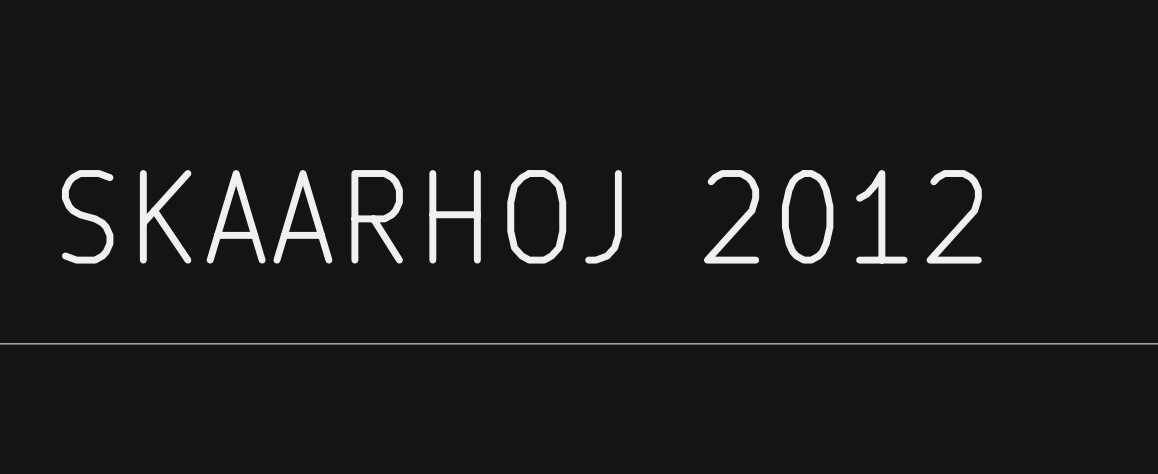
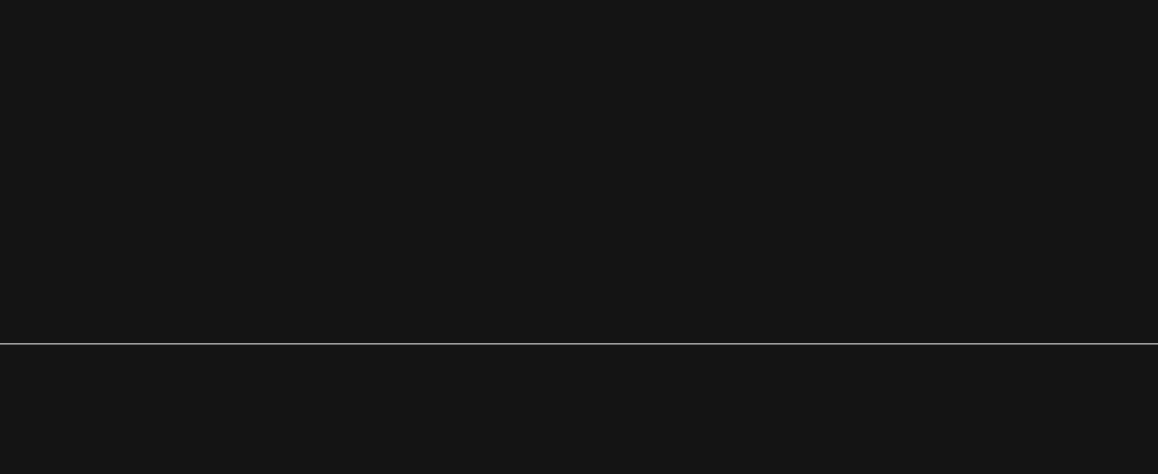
text: SKAARHOJ 2012 (521, 216) -> none

